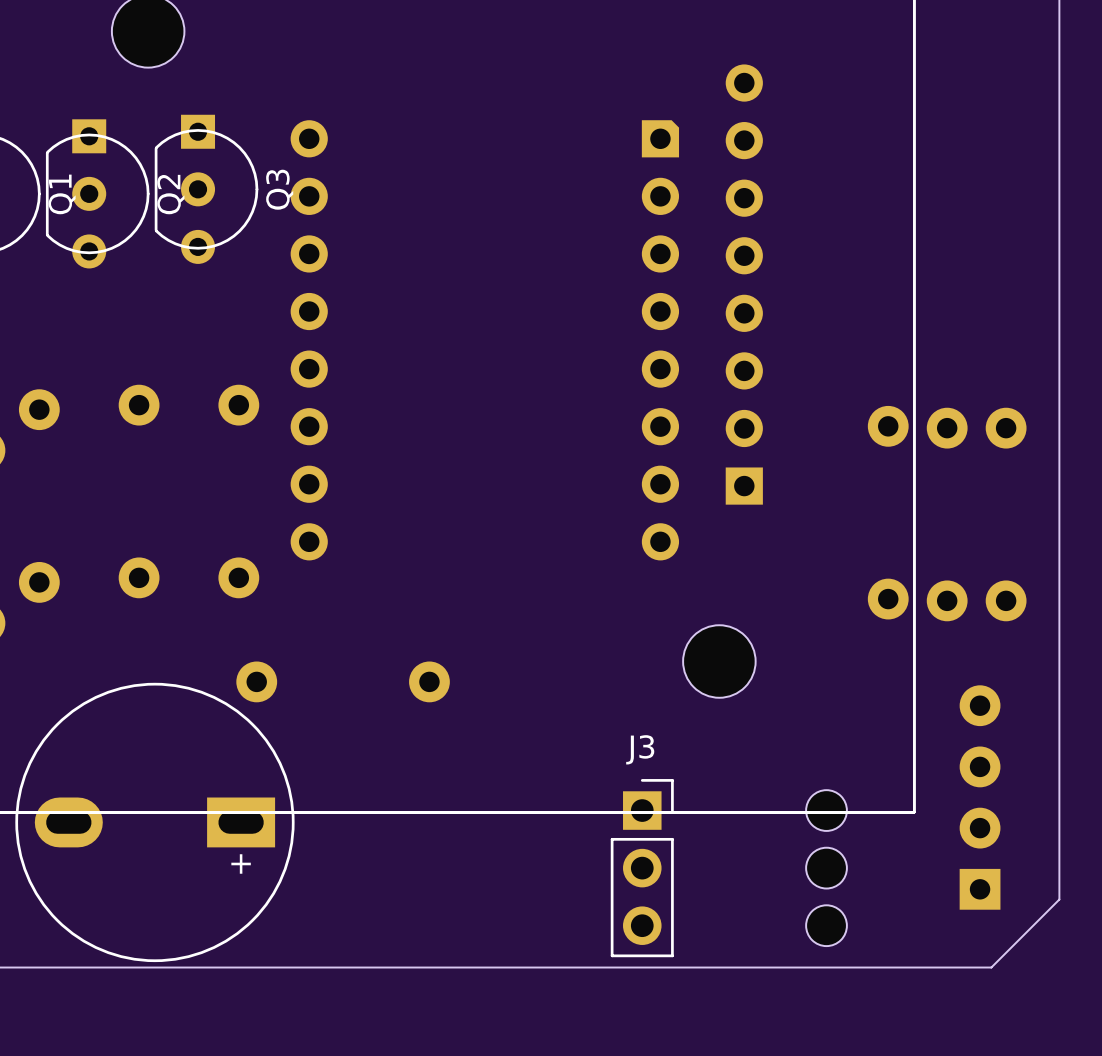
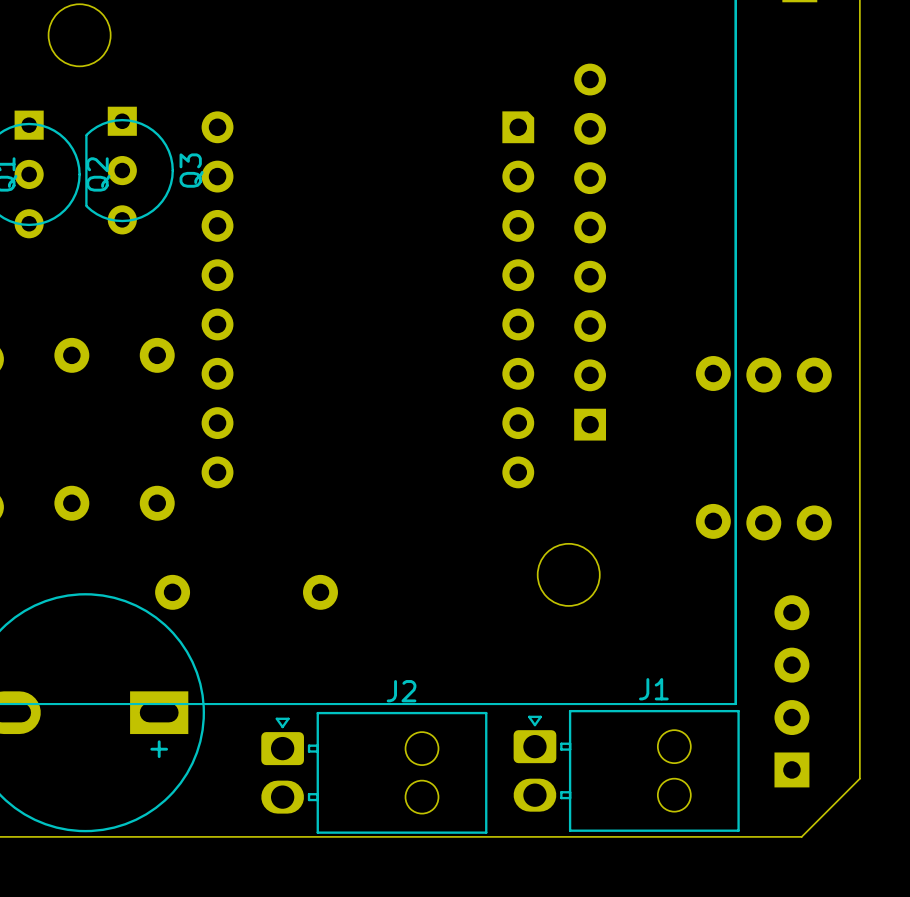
J3: (728, 868) -> none
J1: none -> (626, 770)
J2: none -> (374, 772)

